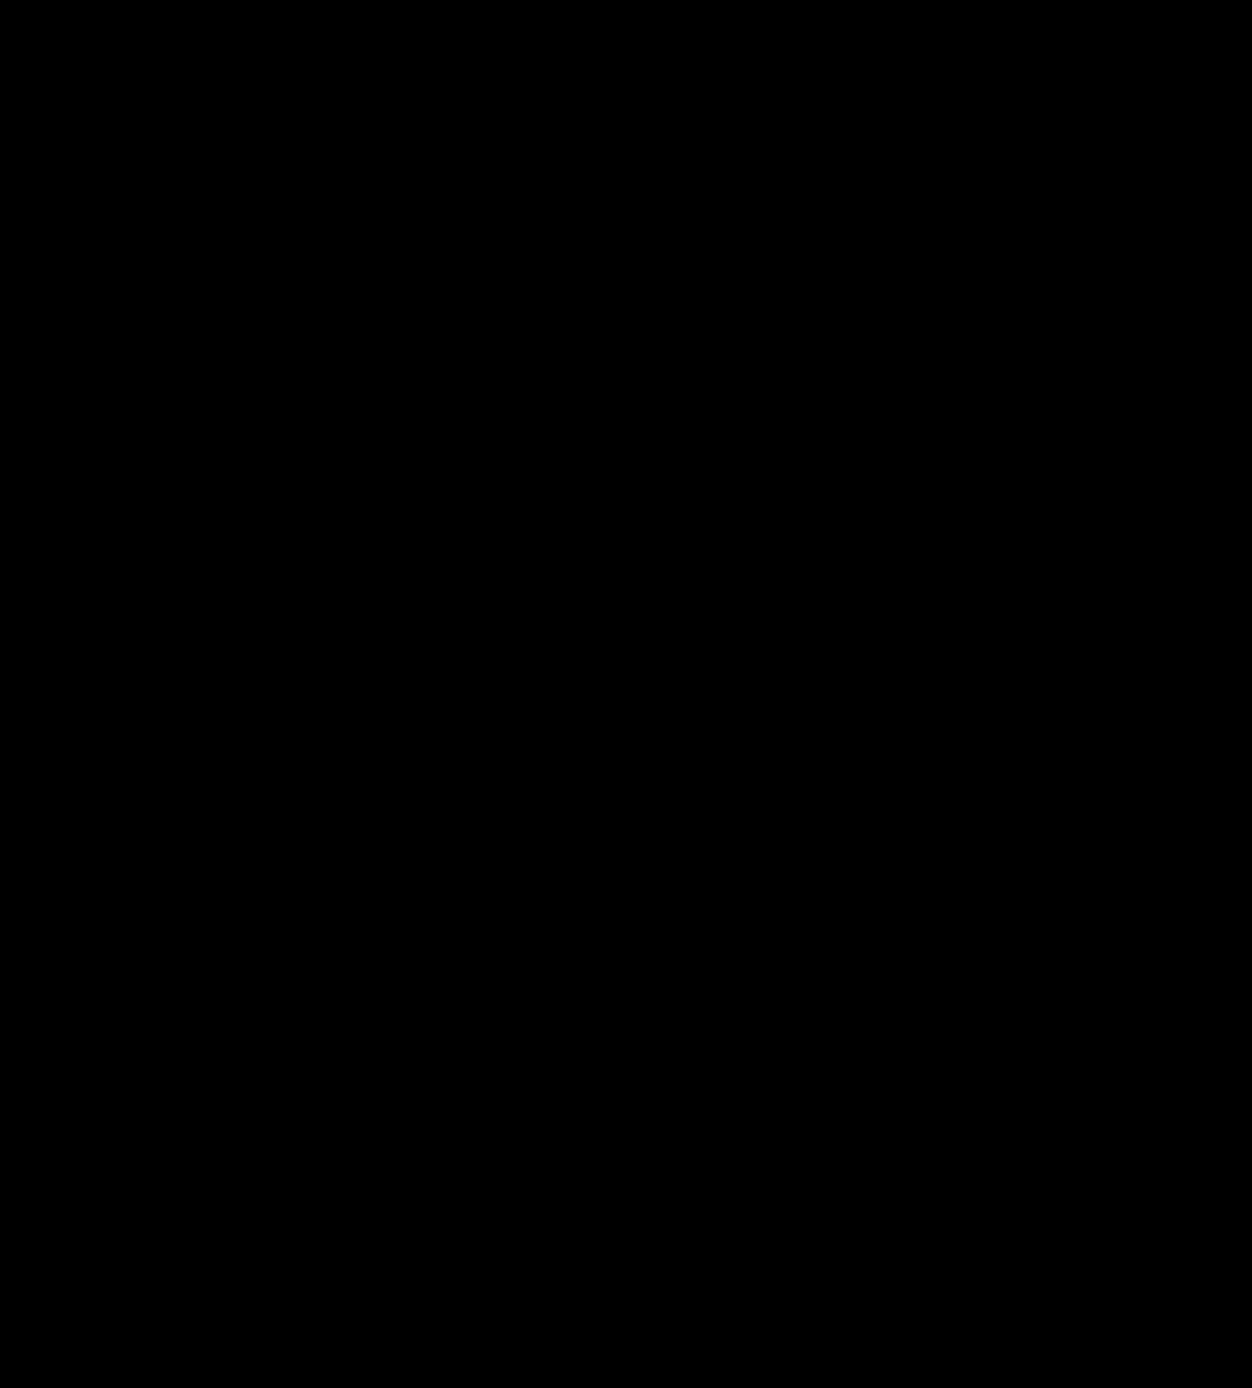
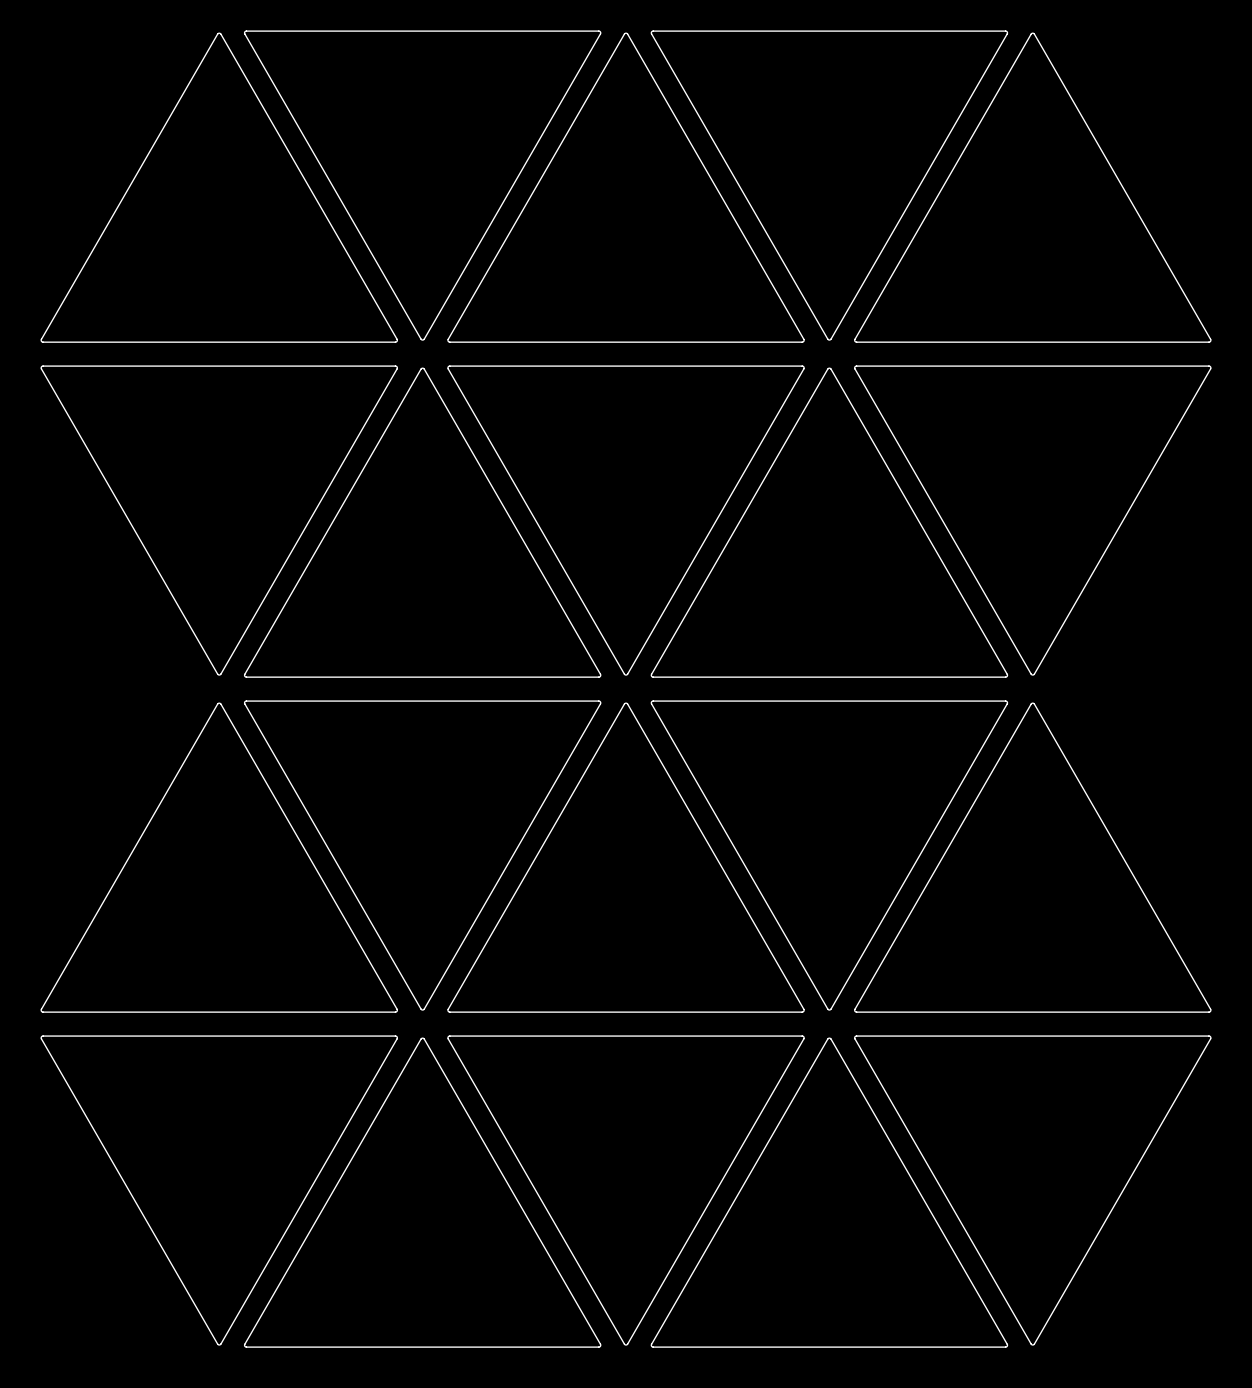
board edge: none -> (246, 31) (600, 32) (423, 339) (421, 339) (244, 33) (246, 31)
board edge: none -> (653, 31) (1007, 32) (830, 339) (827, 339) (651, 33) (653, 31)
board edge: none -> (217, 34) (41, 341) (396, 341) (397, 339) (220, 34) (217, 34)
board edge: none -> (624, 34) (448, 341) (803, 341) (803, 339) (627, 34) (624, 34)
board edge: none -> (1031, 34) (854, 341) (1209, 341) (1210, 339) (1034, 34) (1031, 34)
board edge: none -> (43, 366) (397, 367) (220, 674) (217, 674) (41, 368) (43, 366)
board edge: none -> (449, 366) (803, 367) (626, 674) (624, 674) (448, 368) (449, 366)
board edge: none -> (856, 366) (1210, 367) (1033, 674) (1031, 674) (854, 368) (856, 366)
board edge: none -> (421, 369) (244, 676) (599, 676) (600, 674) (424, 369) (421, 369)
board edge: none -> (827, 369) (651, 676) (1006, 676) (1007, 674) (831, 369) (827, 369)
board edge: none -> (246, 701) (600, 702) (423, 1009) (421, 1009) (244, 703) (246, 701)
board edge: none -> (653, 701) (1007, 702) (830, 1009) (827, 1009) (651, 703) (653, 701)
board edge: none -> (217, 704) (41, 1011) (396, 1011) (397, 1009) (220, 704) (217, 704)
board edge: none -> (624, 704) (448, 1011) (803, 1011) (803, 1009) (627, 704) (624, 704)
board edge: none -> (1031, 704) (854, 1011) (1209, 1011) (1210, 1009) (1034, 704) (1031, 704)
board edge: none -> (43, 1036) (397, 1036) (220, 1344) (217, 1344) (41, 1038) (43, 1036)
board edge: none -> (449, 1036) (803, 1036) (626, 1344) (624, 1344) (448, 1038) (449, 1036)
board edge: none -> (856, 1036) (1210, 1036) (1033, 1344) (1031, 1344) (854, 1038) (856, 1036)
board edge: none -> (421, 1039) (244, 1346) (599, 1346) (600, 1344) (424, 1039) (421, 1039)
board edge: none -> (827, 1039) (651, 1346) (1006, 1346) (1007, 1344) (831, 1039) (827, 1039)

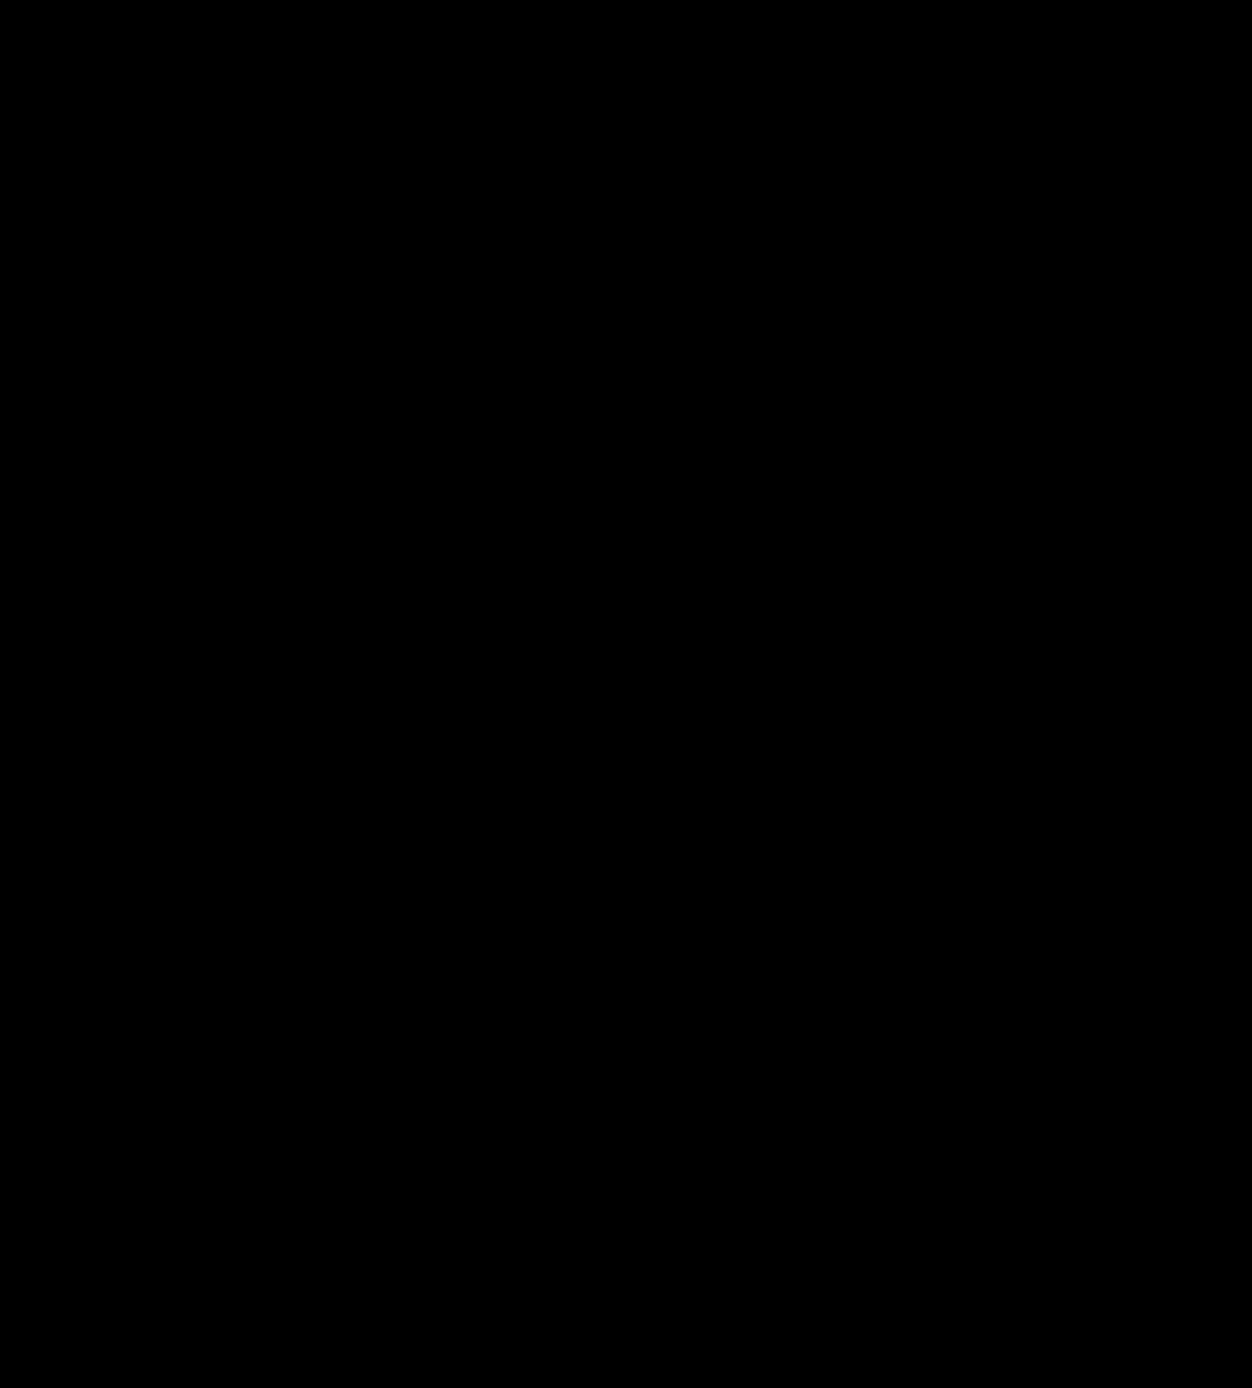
board edge: (246, 31) (600, 32) (423, 339) (421, 339) (244, 33) (246, 31) -> none
board edge: (653, 31) (1007, 32) (830, 339) (827, 339) (651, 33) (653, 31) -> none
board edge: (217, 34) (41, 341) (396, 341) (397, 339) (220, 34) (217, 34) -> none
board edge: (624, 34) (448, 341) (803, 341) (803, 339) (627, 34) (624, 34) -> none
board edge: (1031, 34) (854, 341) (1209, 341) (1210, 339) (1034, 34) (1031, 34) -> none
board edge: (43, 366) (397, 367) (220, 674) (217, 674) (41, 368) (43, 366) -> none
board edge: (449, 366) (803, 367) (626, 674) (624, 674) (448, 368) (449, 366) -> none
board edge: (856, 366) (1210, 367) (1033, 674) (1031, 674) (854, 368) (856, 366) -> none
board edge: (421, 369) (244, 676) (599, 676) (600, 674) (424, 369) (421, 369) -> none
board edge: (827, 369) (651, 676) (1006, 676) (1007, 674) (831, 369) (827, 369) -> none
board edge: (246, 701) (600, 702) (423, 1009) (421, 1009) (244, 703) (246, 701) -> none
board edge: (653, 701) (1007, 702) (830, 1009) (827, 1009) (651, 703) (653, 701) -> none
board edge: (217, 704) (41, 1011) (396, 1011) (397, 1009) (220, 704) (217, 704) -> none
board edge: (624, 704) (448, 1011) (803, 1011) (803, 1009) (627, 704) (624, 704) -> none
board edge: (1031, 704) (854, 1011) (1209, 1011) (1210, 1009) (1034, 704) (1031, 704) -> none
board edge: (43, 1036) (397, 1036) (220, 1344) (217, 1344) (41, 1038) (43, 1036) -> none
board edge: (449, 1036) (803, 1036) (626, 1344) (624, 1344) (448, 1038) (449, 1036) -> none
board edge: (856, 1036) (1210, 1036) (1033, 1344) (1031, 1344) (854, 1038) (856, 1036) -> none
board edge: (421, 1039) (244, 1346) (599, 1346) (600, 1344) (424, 1039) (421, 1039) -> none
board edge: (827, 1039) (651, 1346) (1006, 1346) (1007, 1344) (831, 1039) (827, 1039) -> none

